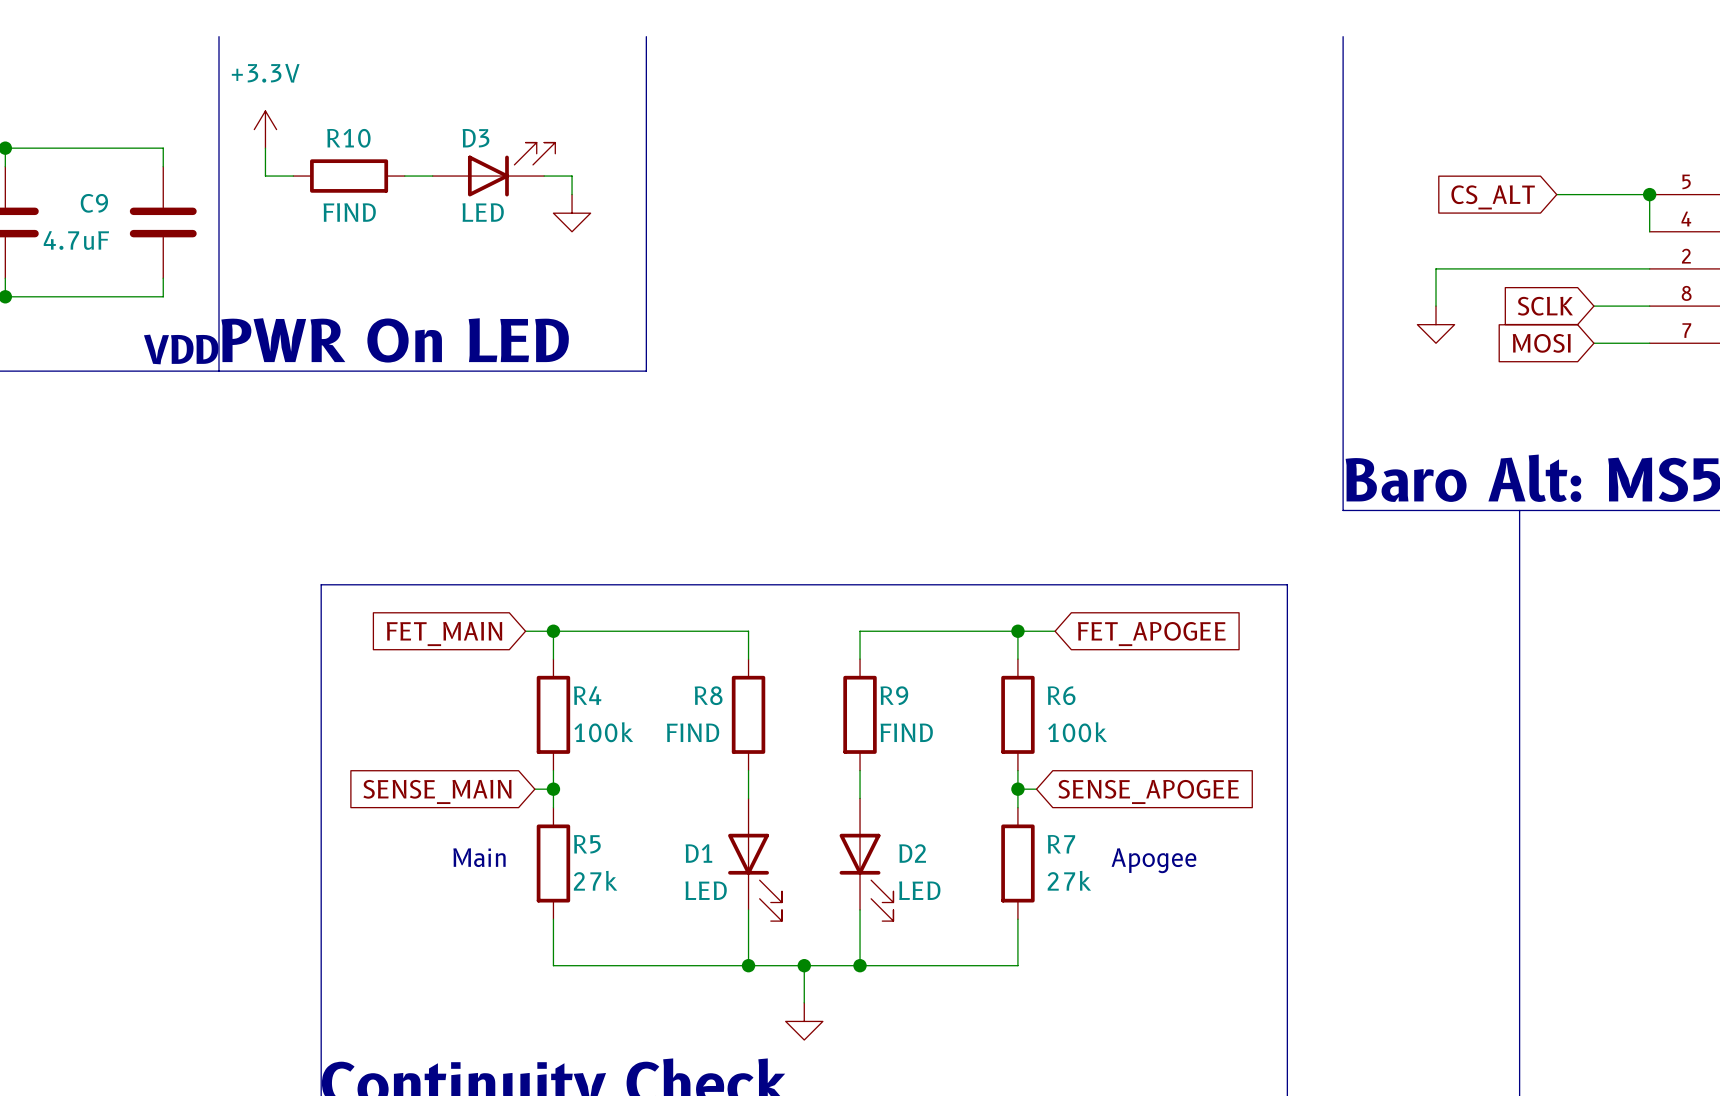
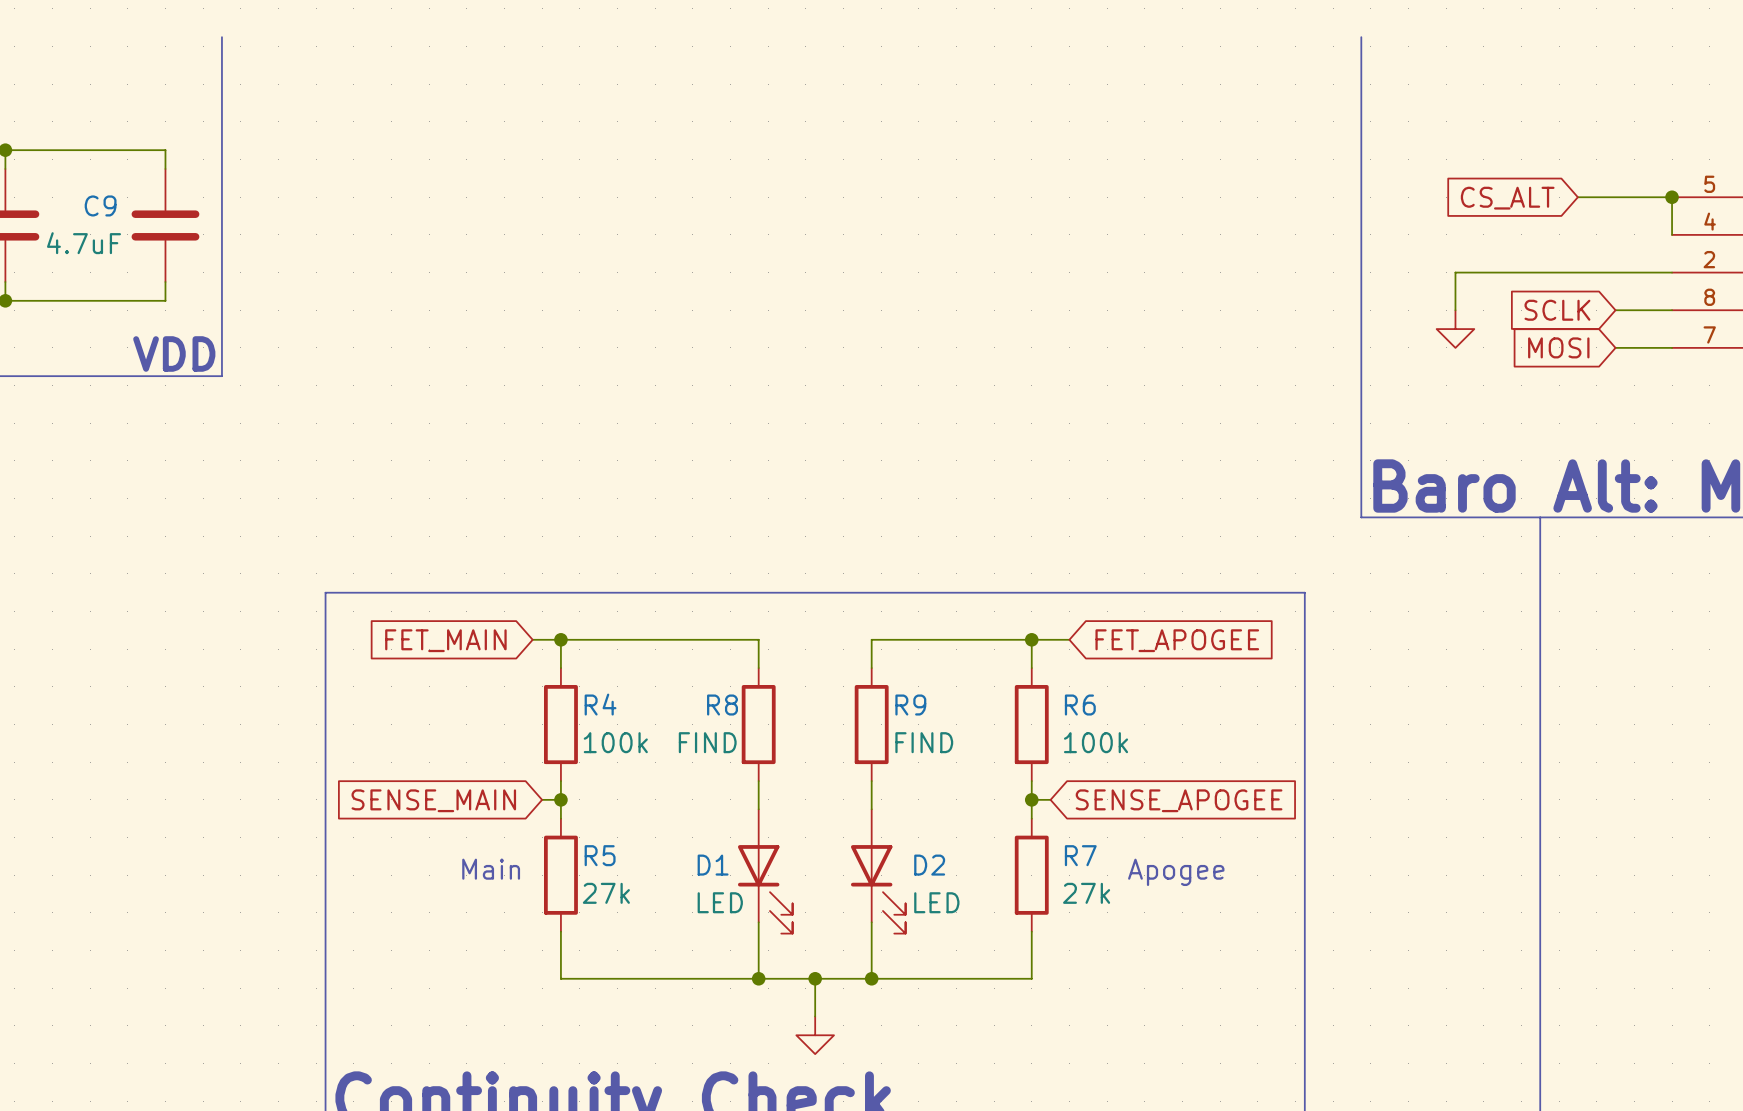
line: (646, 36) (646, 371) (219, 371) -> none
power symbol: +3.3V (265, 129) -> none
wire: (265, 148) (265, 176) (293, 176) -> none
D3: LED (493, 169) -> none
R10: FIND (349, 176) -> none
wire: (404, 176) (432, 176) -> none
wire: (544, 176) (572, 176) (572, 194) -> none
power symbol: (572, 213) -> none
text: PWR On LED (395, 340) -> none

